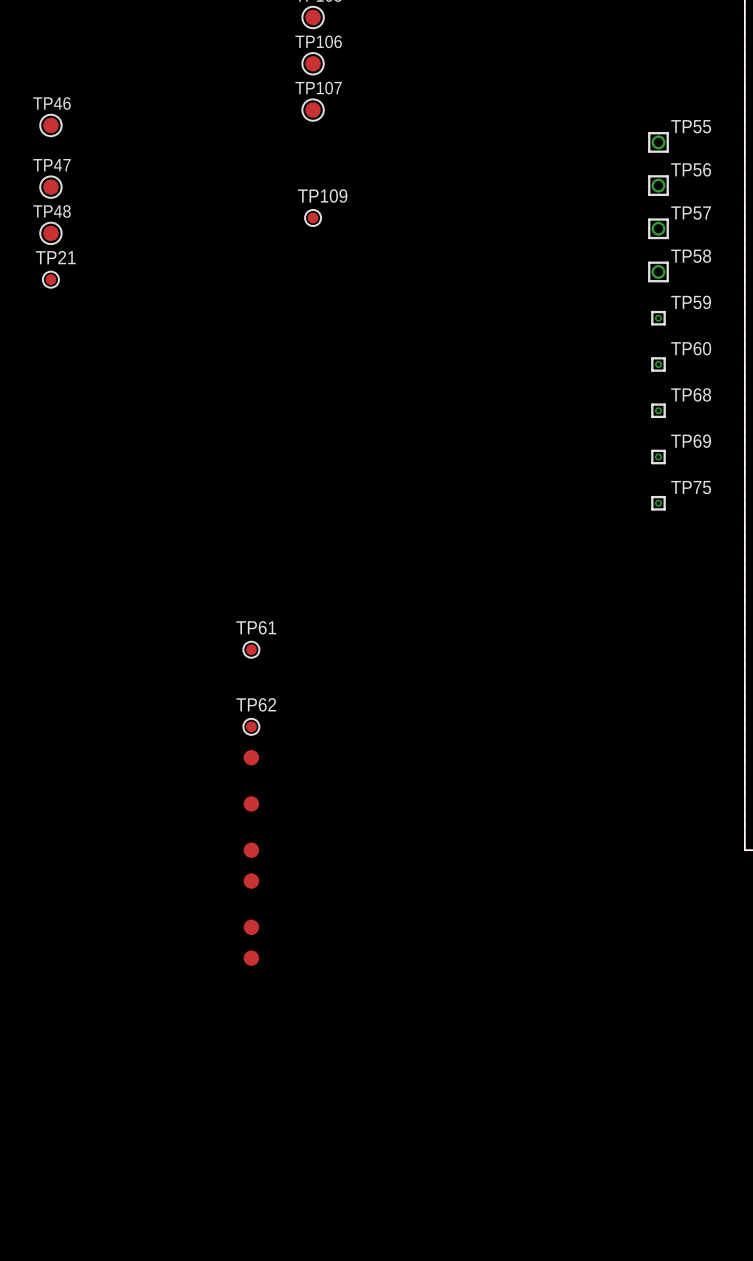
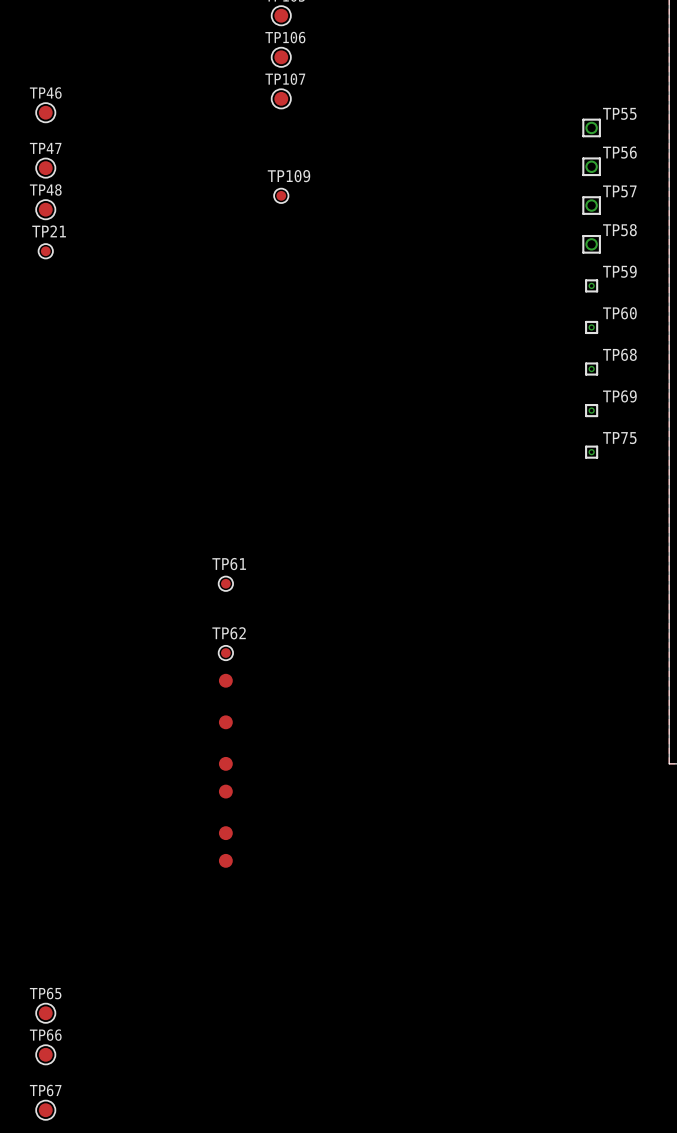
TP65: none -> (45, 1013)
TP66: none -> (45, 1054)
TP67: none -> (45, 1110)

